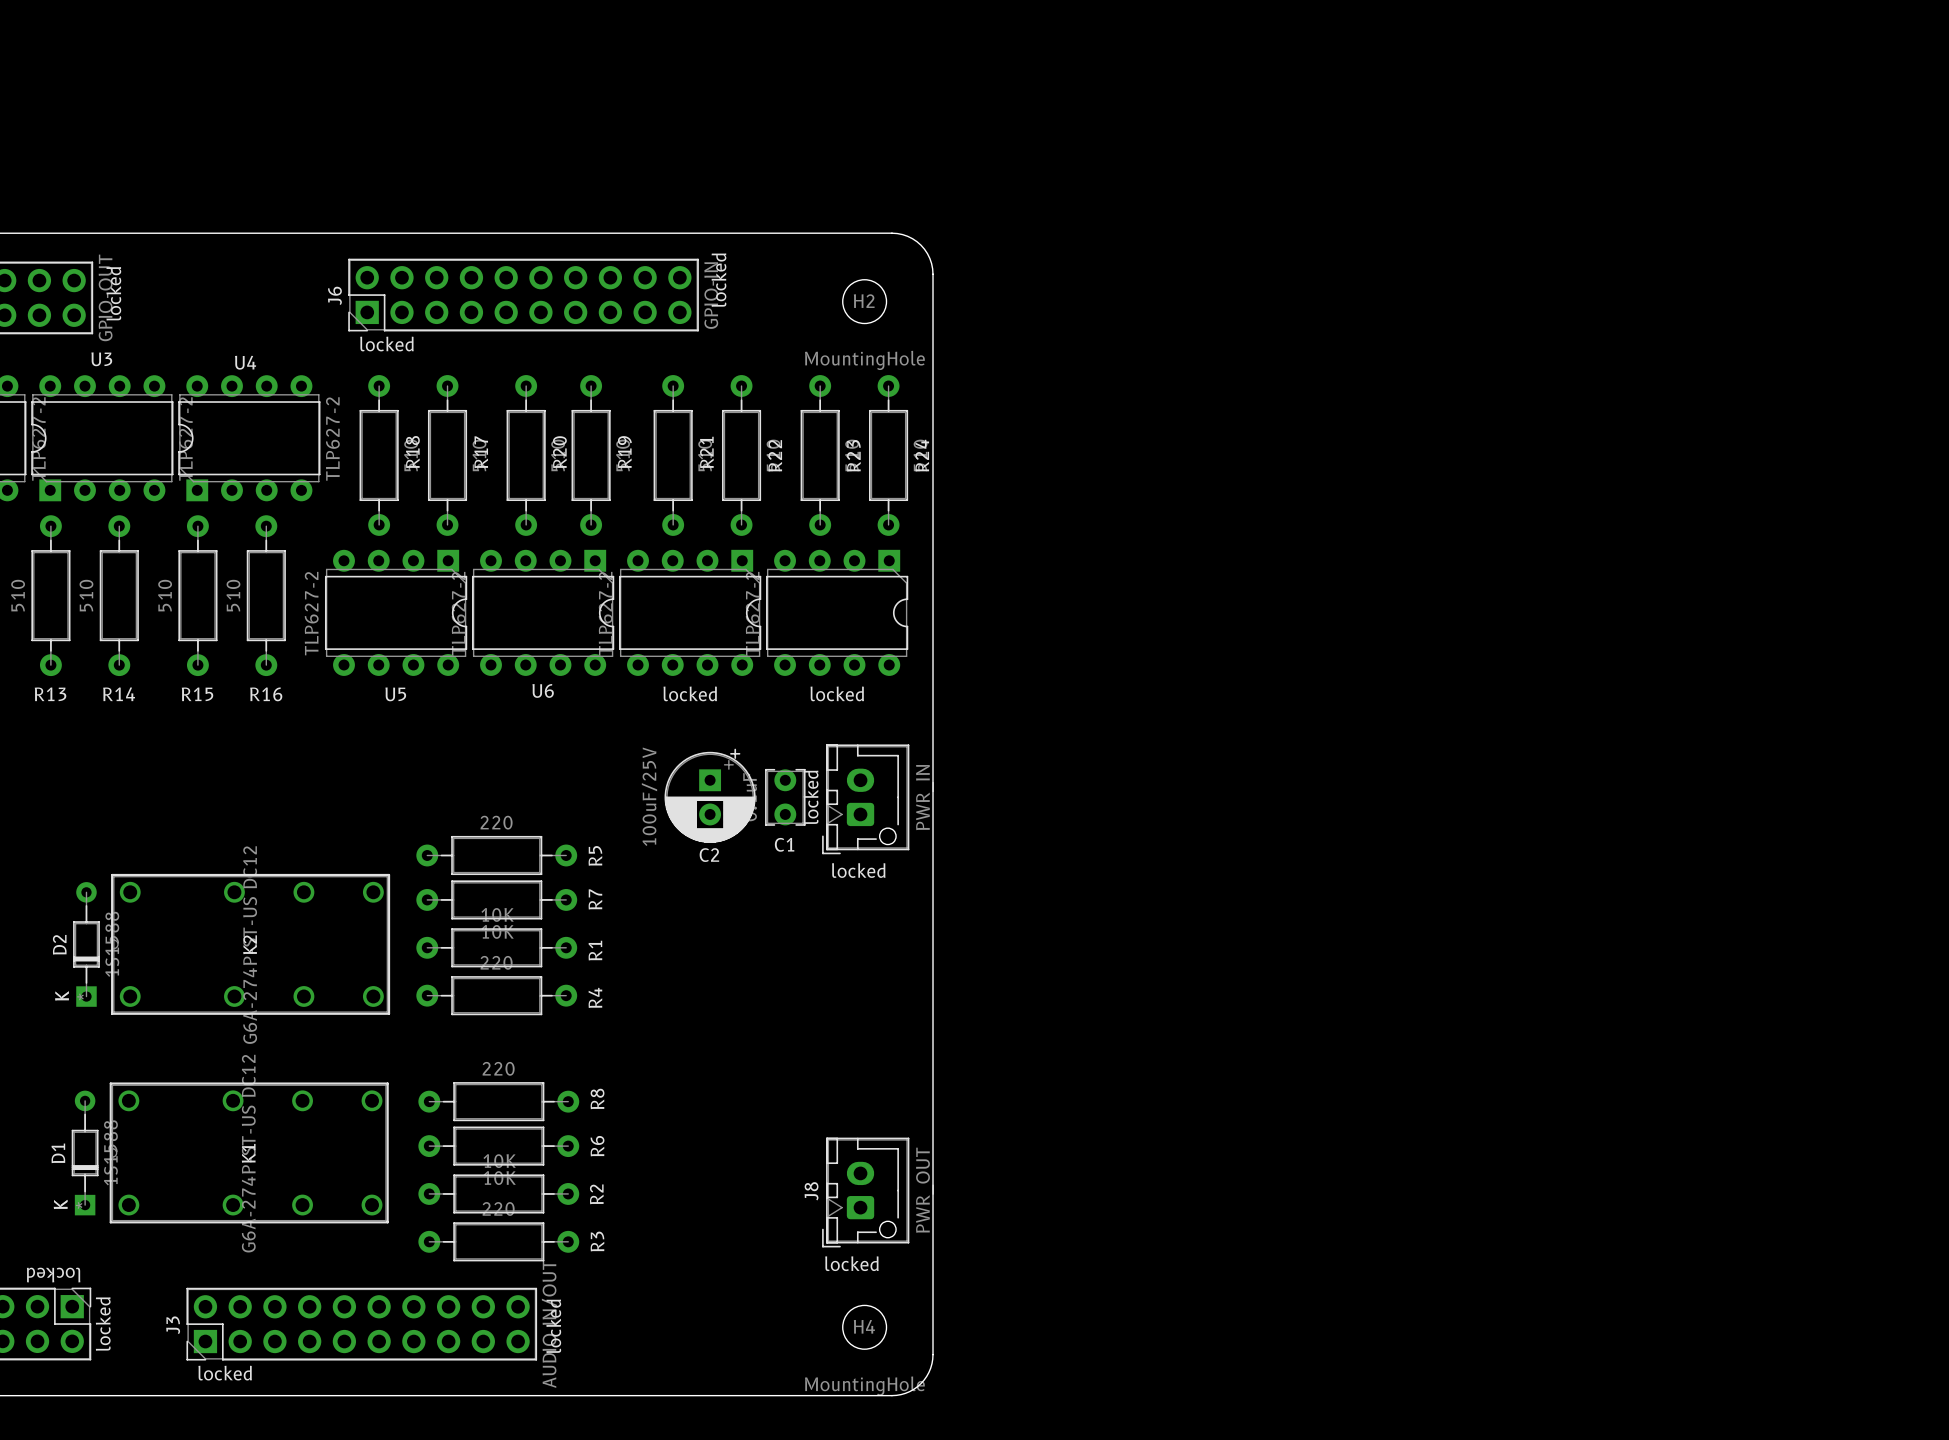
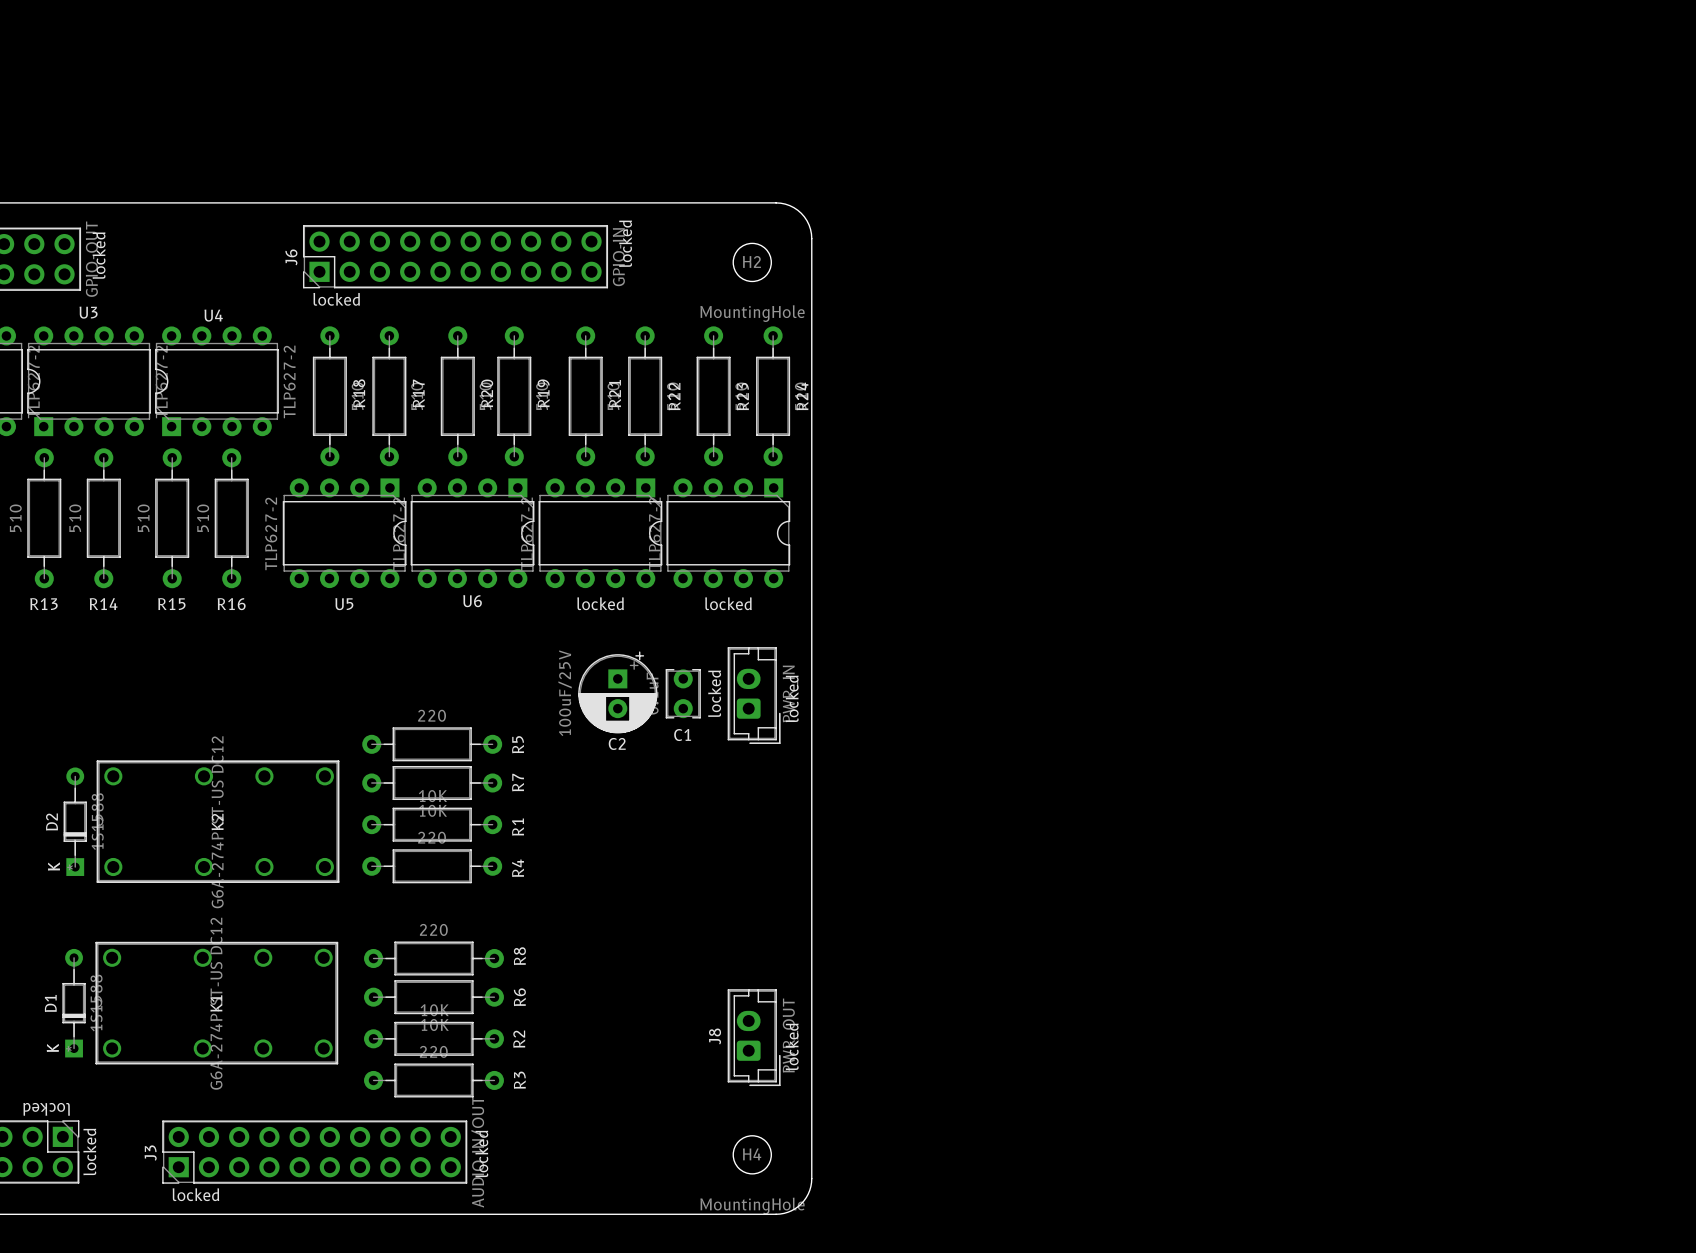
locked footprint: [822, 744, 910, 855] -> [727, 647, 781, 744]
text rotation: 0° (858, 870) -> 90° counterclockwise (792, 698)
text position: locked (858, 870) -> locked (792, 698)
J8 footprint: [822, 1137, 910, 1248] -> [727, 989, 781, 1087]
text rotation: 0° (851, 1263) -> 90° counterclockwise (792, 1046)
text position: locked (851, 1263) -> locked (792, 1046)

